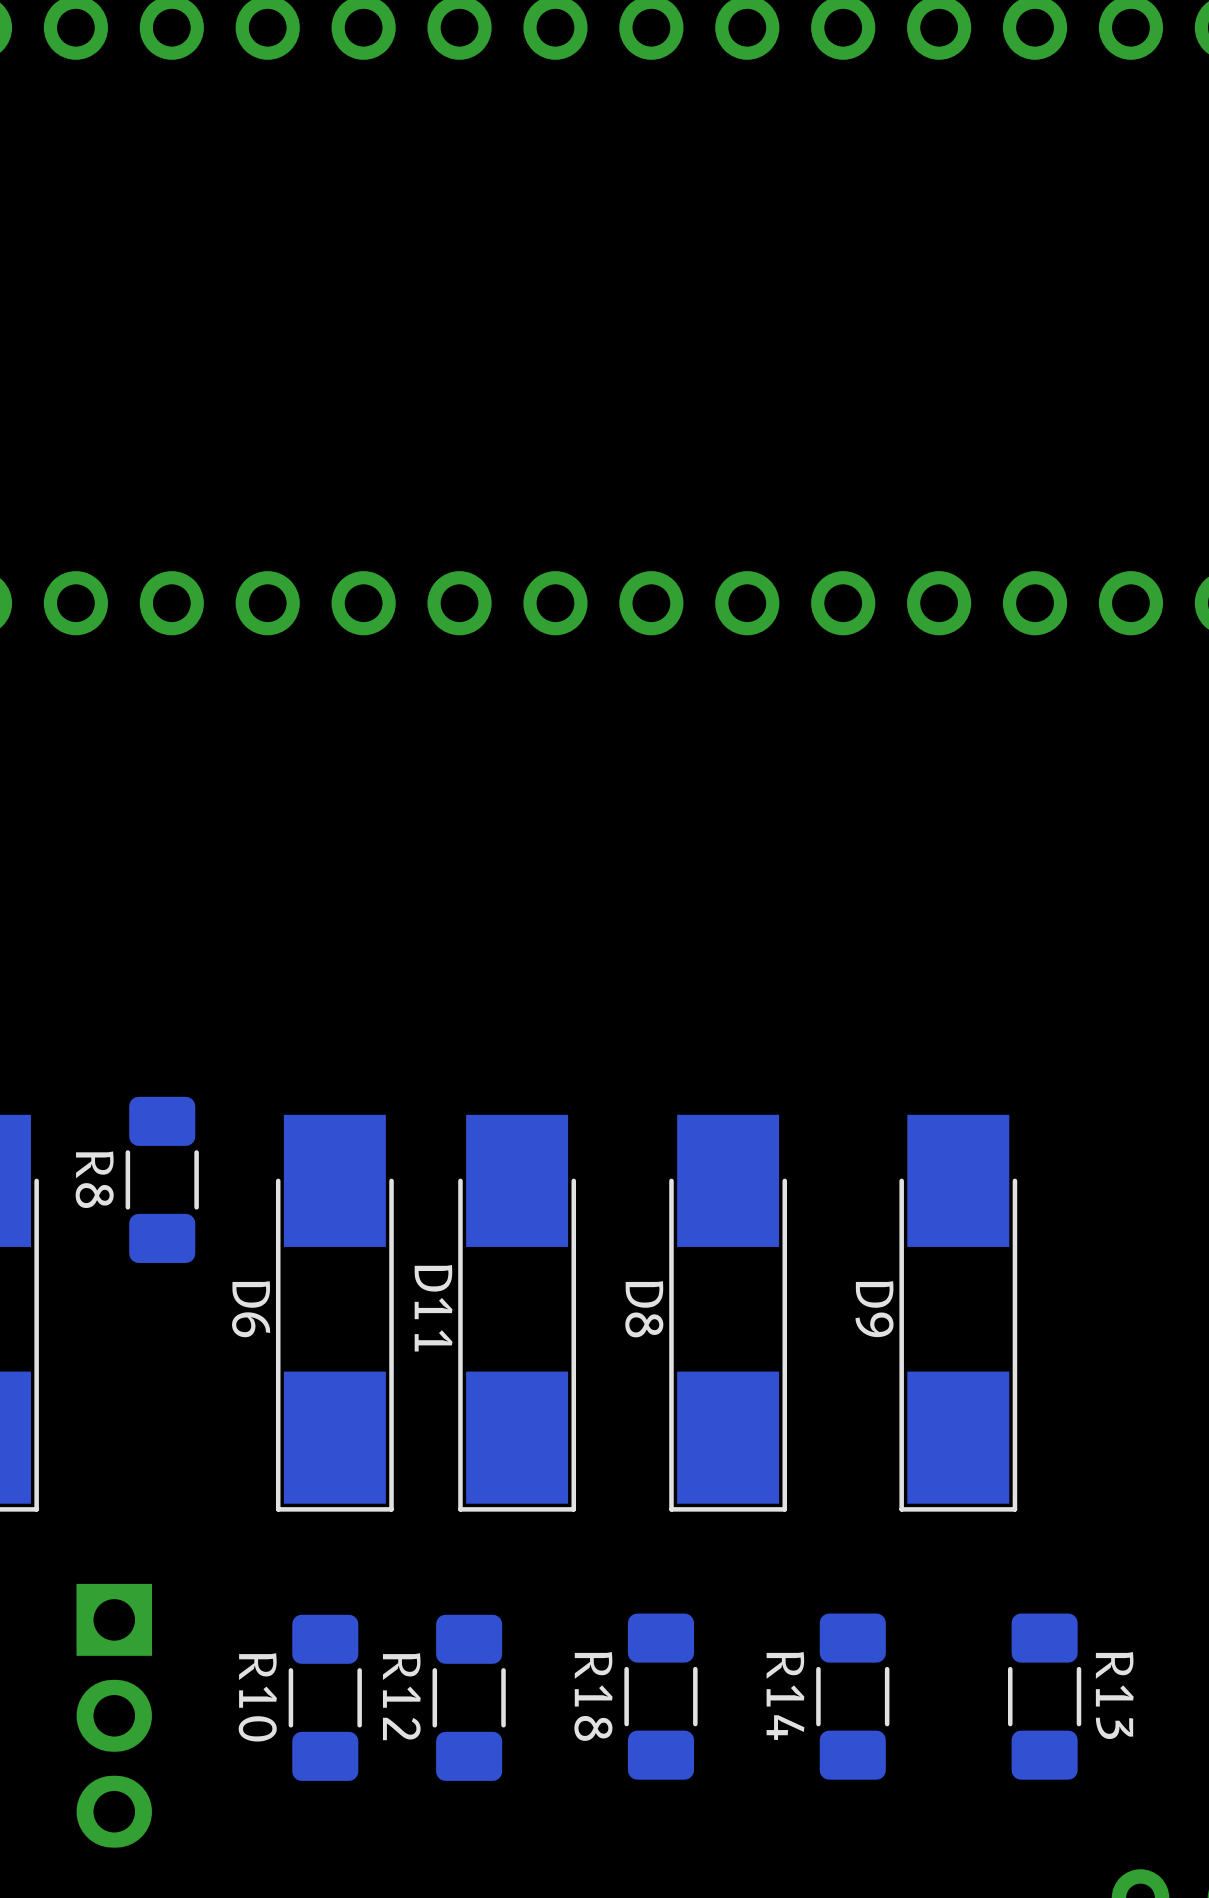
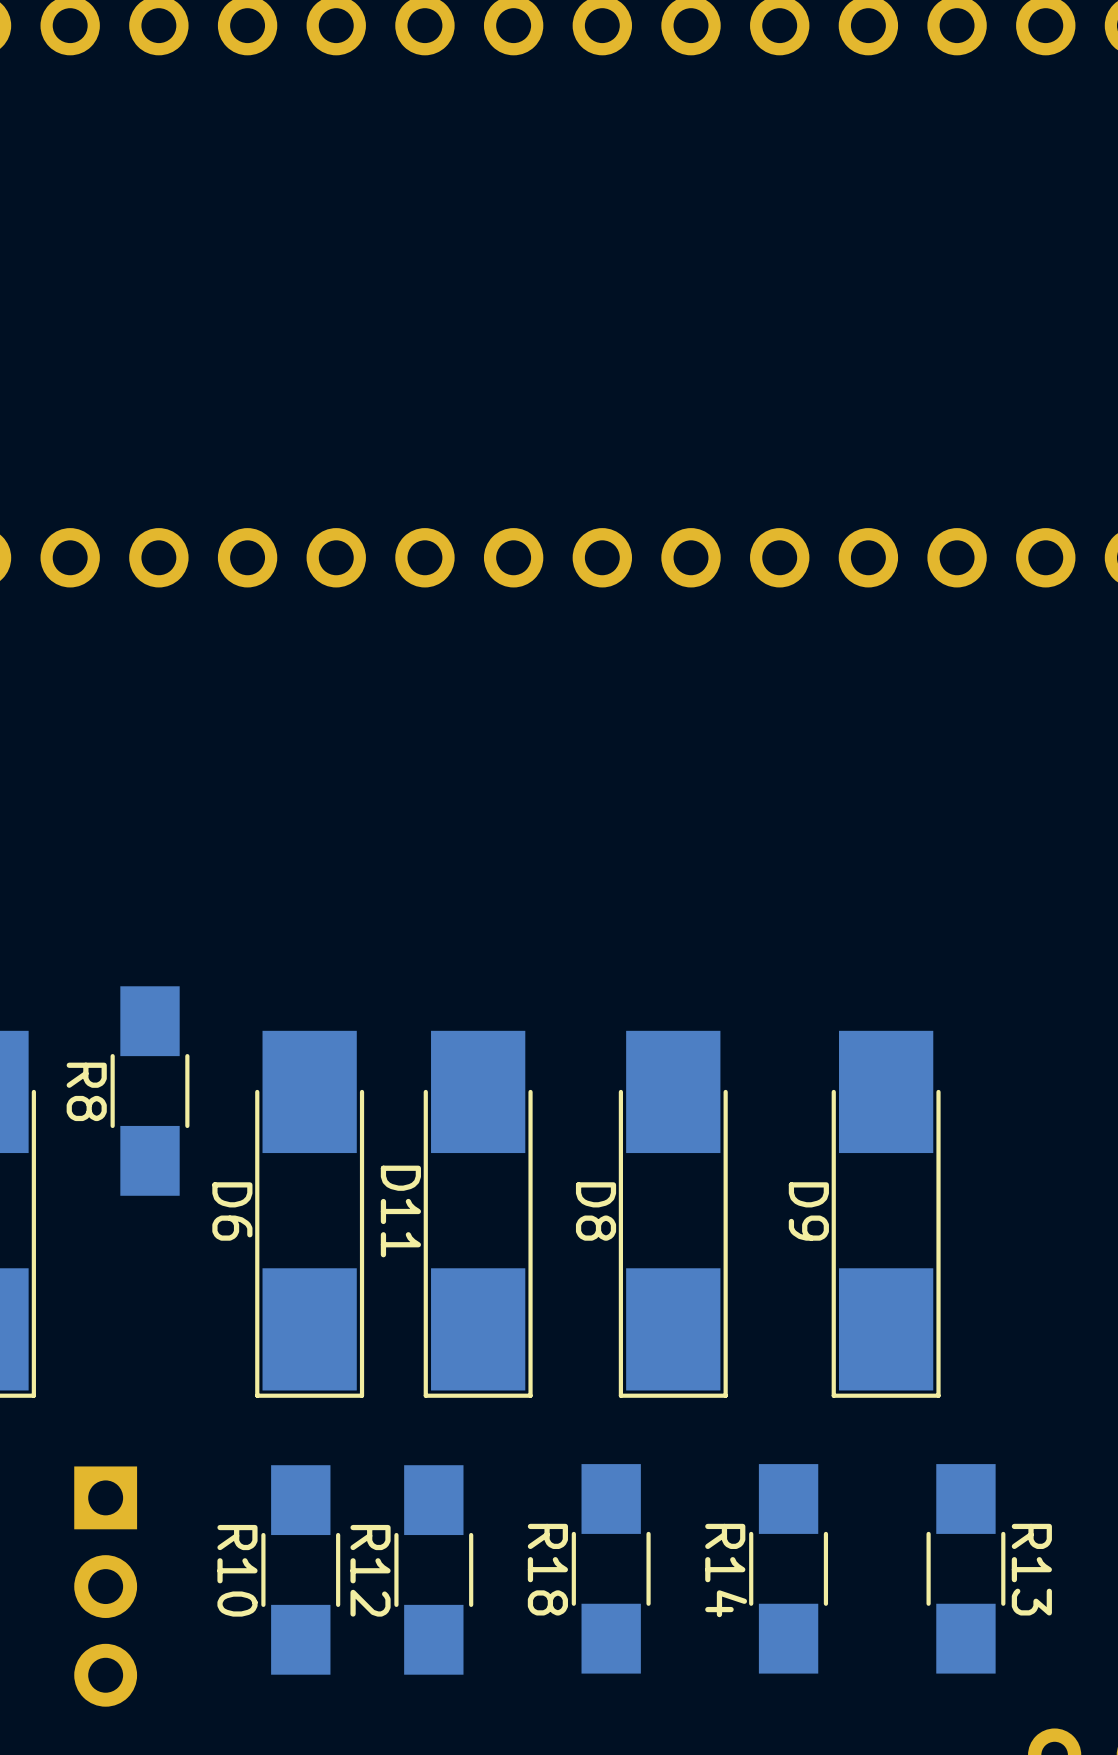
R8 footprint: [125, 1096, 199, 1263] -> [110, 986, 190, 1196]
part footprint: [76, 1583, 153, 1848] -> [74, 1466, 138, 1707]
R18 footprint: [624, 1613, 698, 1780] -> [571, 1464, 651, 1674]
R14 footprint: [816, 1613, 890, 1780] -> [749, 1464, 829, 1674]
R13 footprint: [1008, 1613, 1082, 1780] -> [926, 1464, 1006, 1674]
R10 footprint: [288, 1614, 362, 1781] -> [261, 1465, 341, 1675]
R12 footprint: [432, 1614, 506, 1781] -> [394, 1465, 474, 1675]

